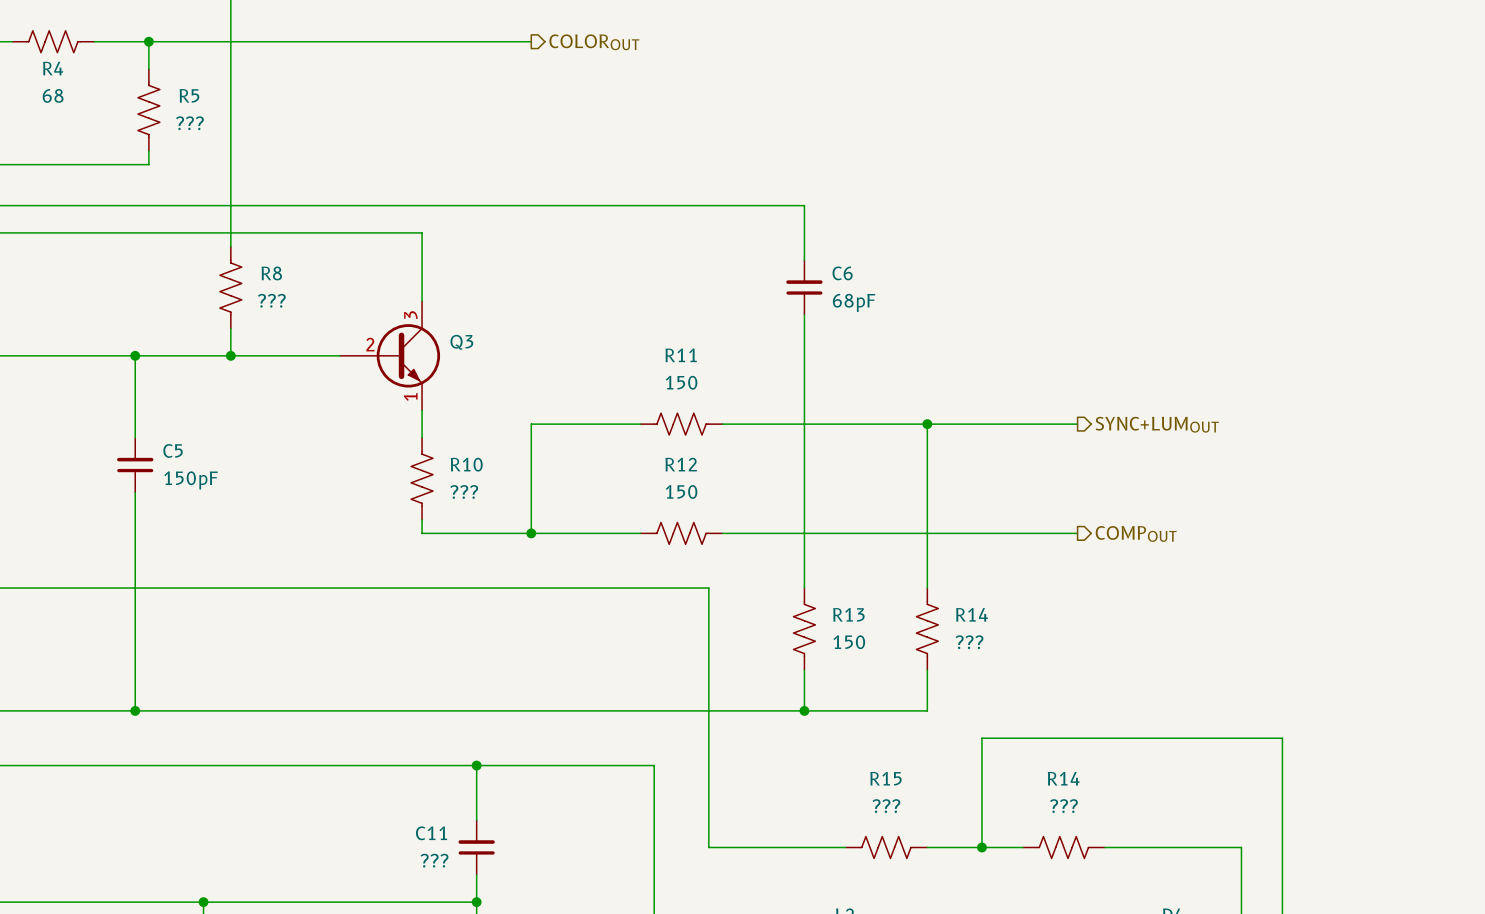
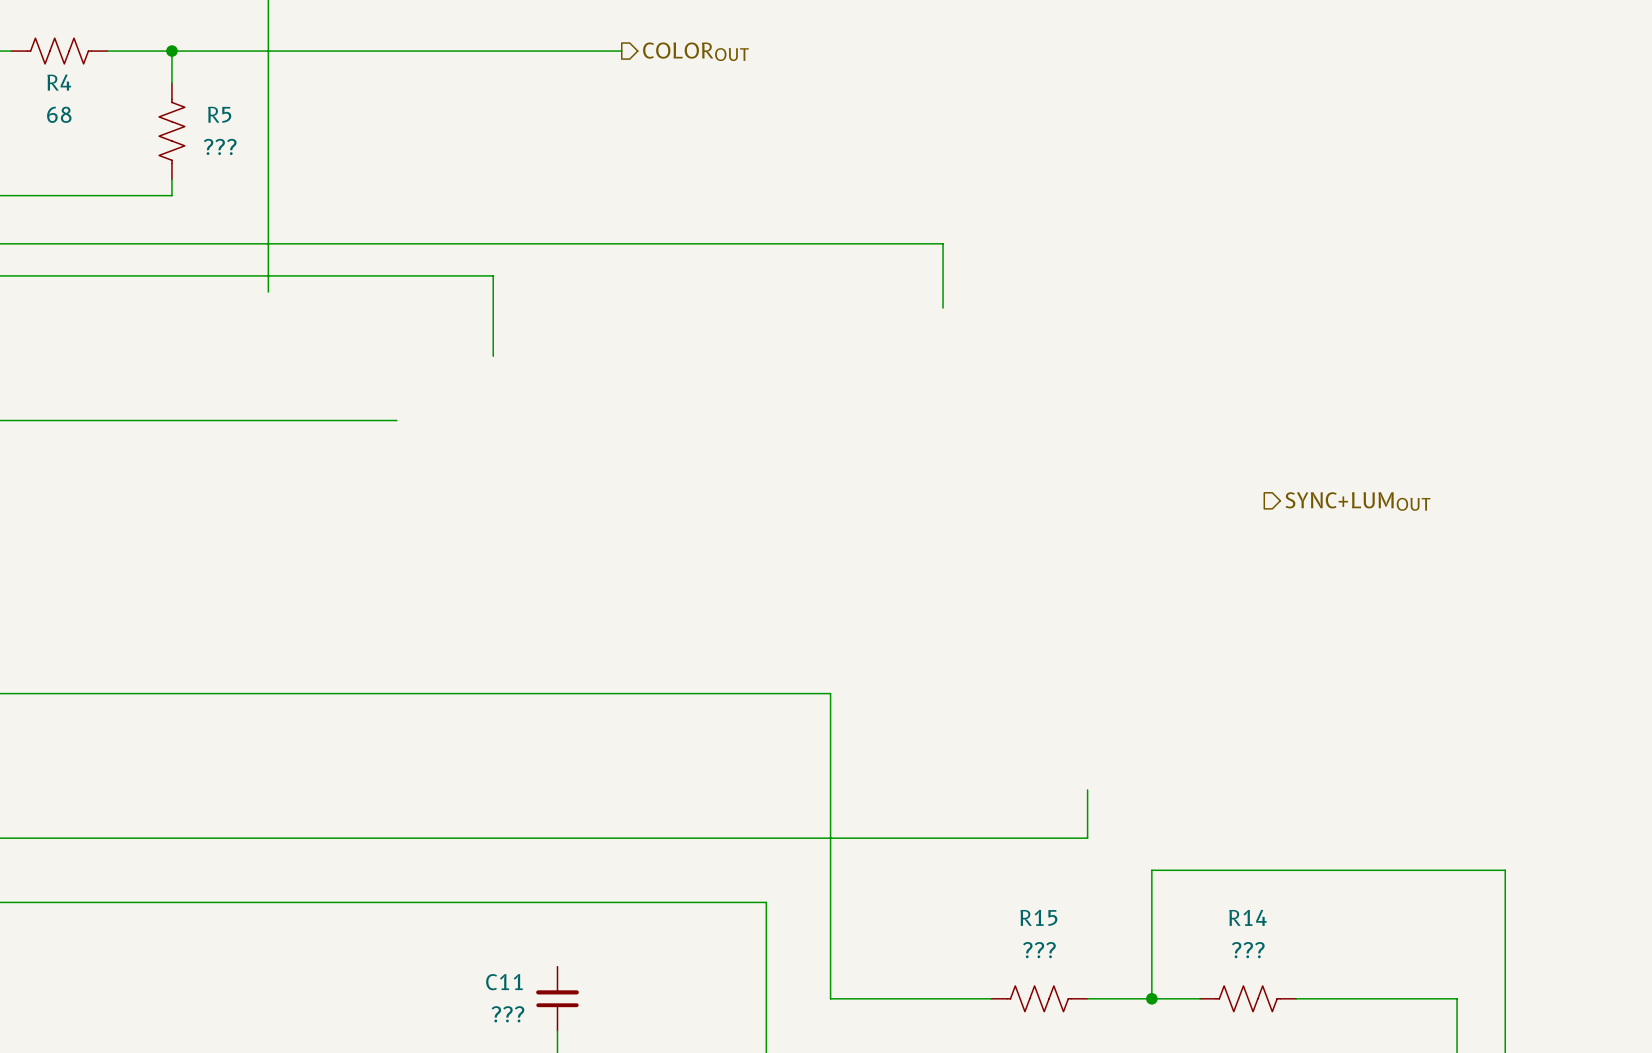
R8: ??? (230, 287) -> none
C6: 68pF (804, 287) -> none
wire: (804, 314) (804, 588) -> none
wire: (230, 328) (230, 355) -> none
wire: (135, 355) (135, 437) -> none
junction: (135, 355) -> none
junction: (230, 355) -> none
Q3: (390, 355) -> none
wire: (422, 410) (422, 437) -> none
wire: (640, 424) (531, 424) (531, 533) -> none
R11: 150 (681, 424) -> none
wire: (722, 424) (1077, 424) -> none
wire: (927, 424) (927, 588) -> none
junction: (927, 424) -> none
C5: 150pF (135, 465) -> none
R10: ??? (422, 478) -> none
wire: (135, 492) (135, 710) -> none
wire: (422, 519) (422, 533) (640, 533) -> none
junction: (531, 533) -> none
R12: 150 (681, 533) -> none
wire: (722, 533) (1077, 533) -> none
hierarchical label: COMPOUT (1136, 533) -> none
R13: 150 (804, 628) -> none
R14: ??? (927, 628) -> none
wire: (804, 669) (804, 710) -> none
junction: (135, 710) -> none
junction: (804, 710) -> none
wire: (476, 765) (476, 820) -> none
junction: (476, 765) -> none

